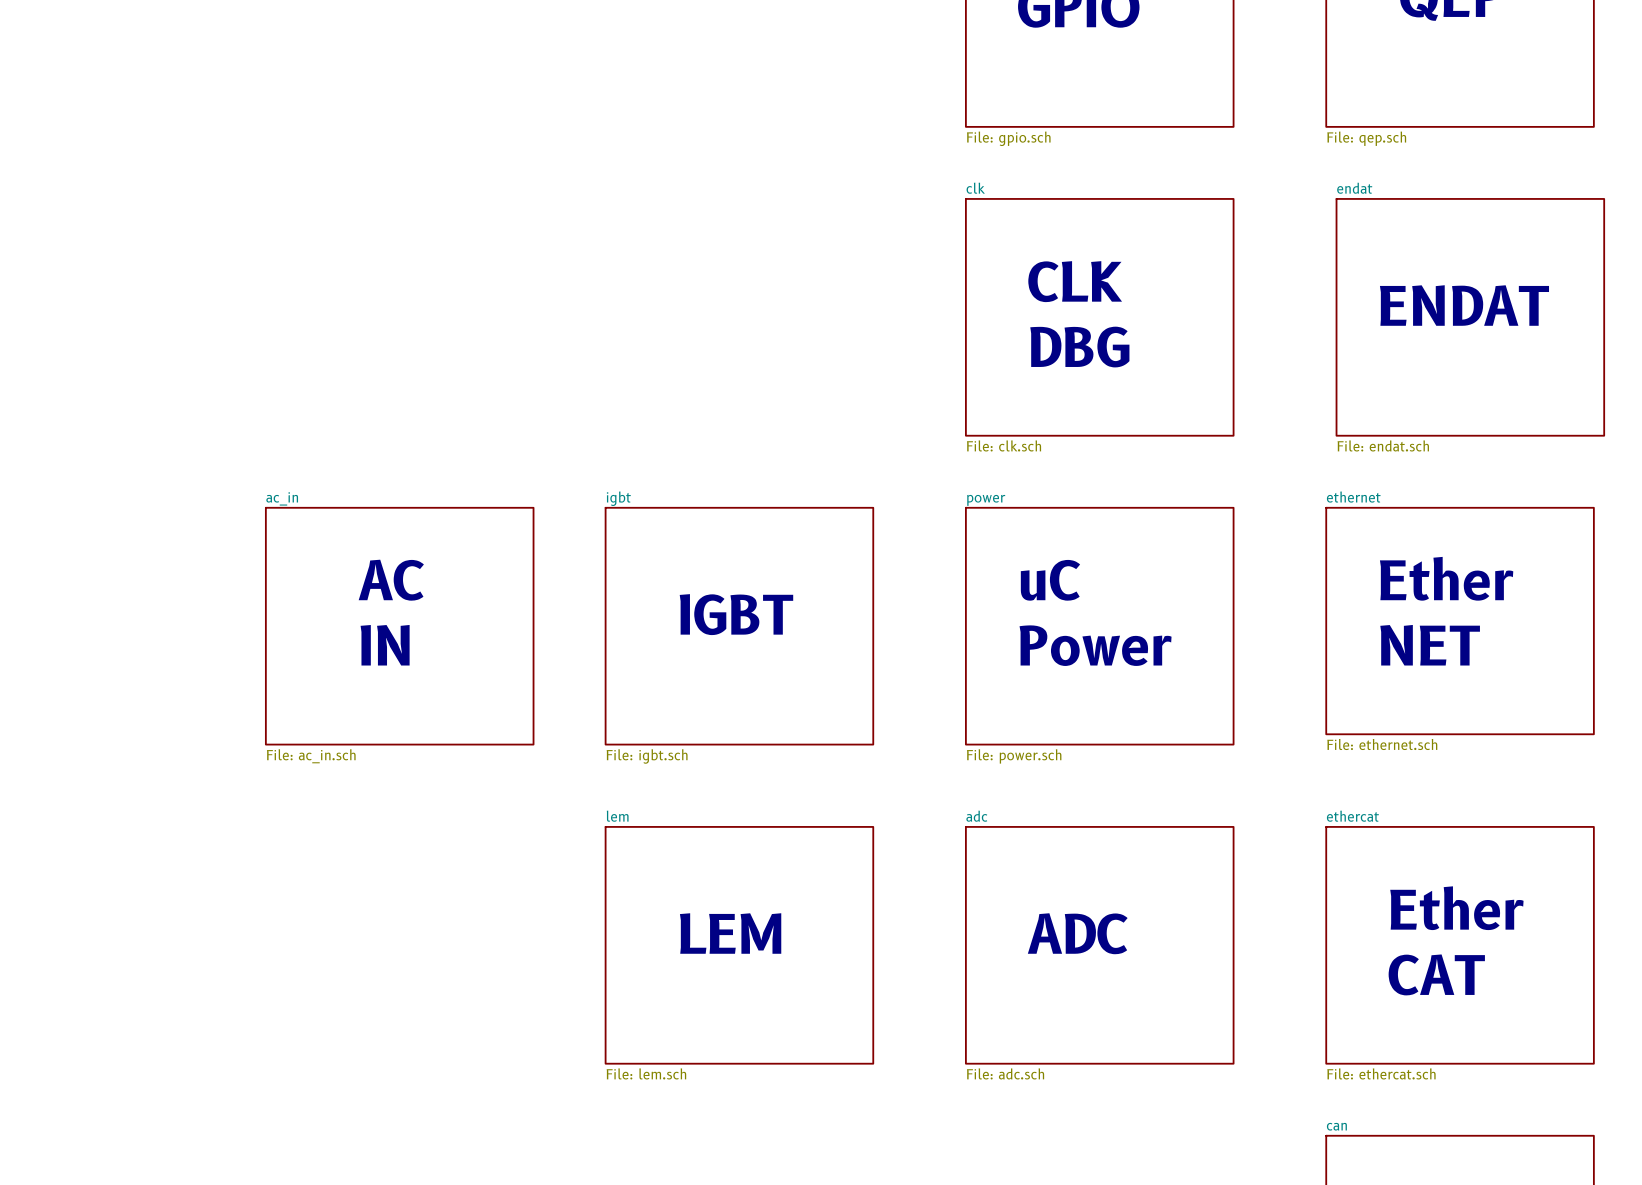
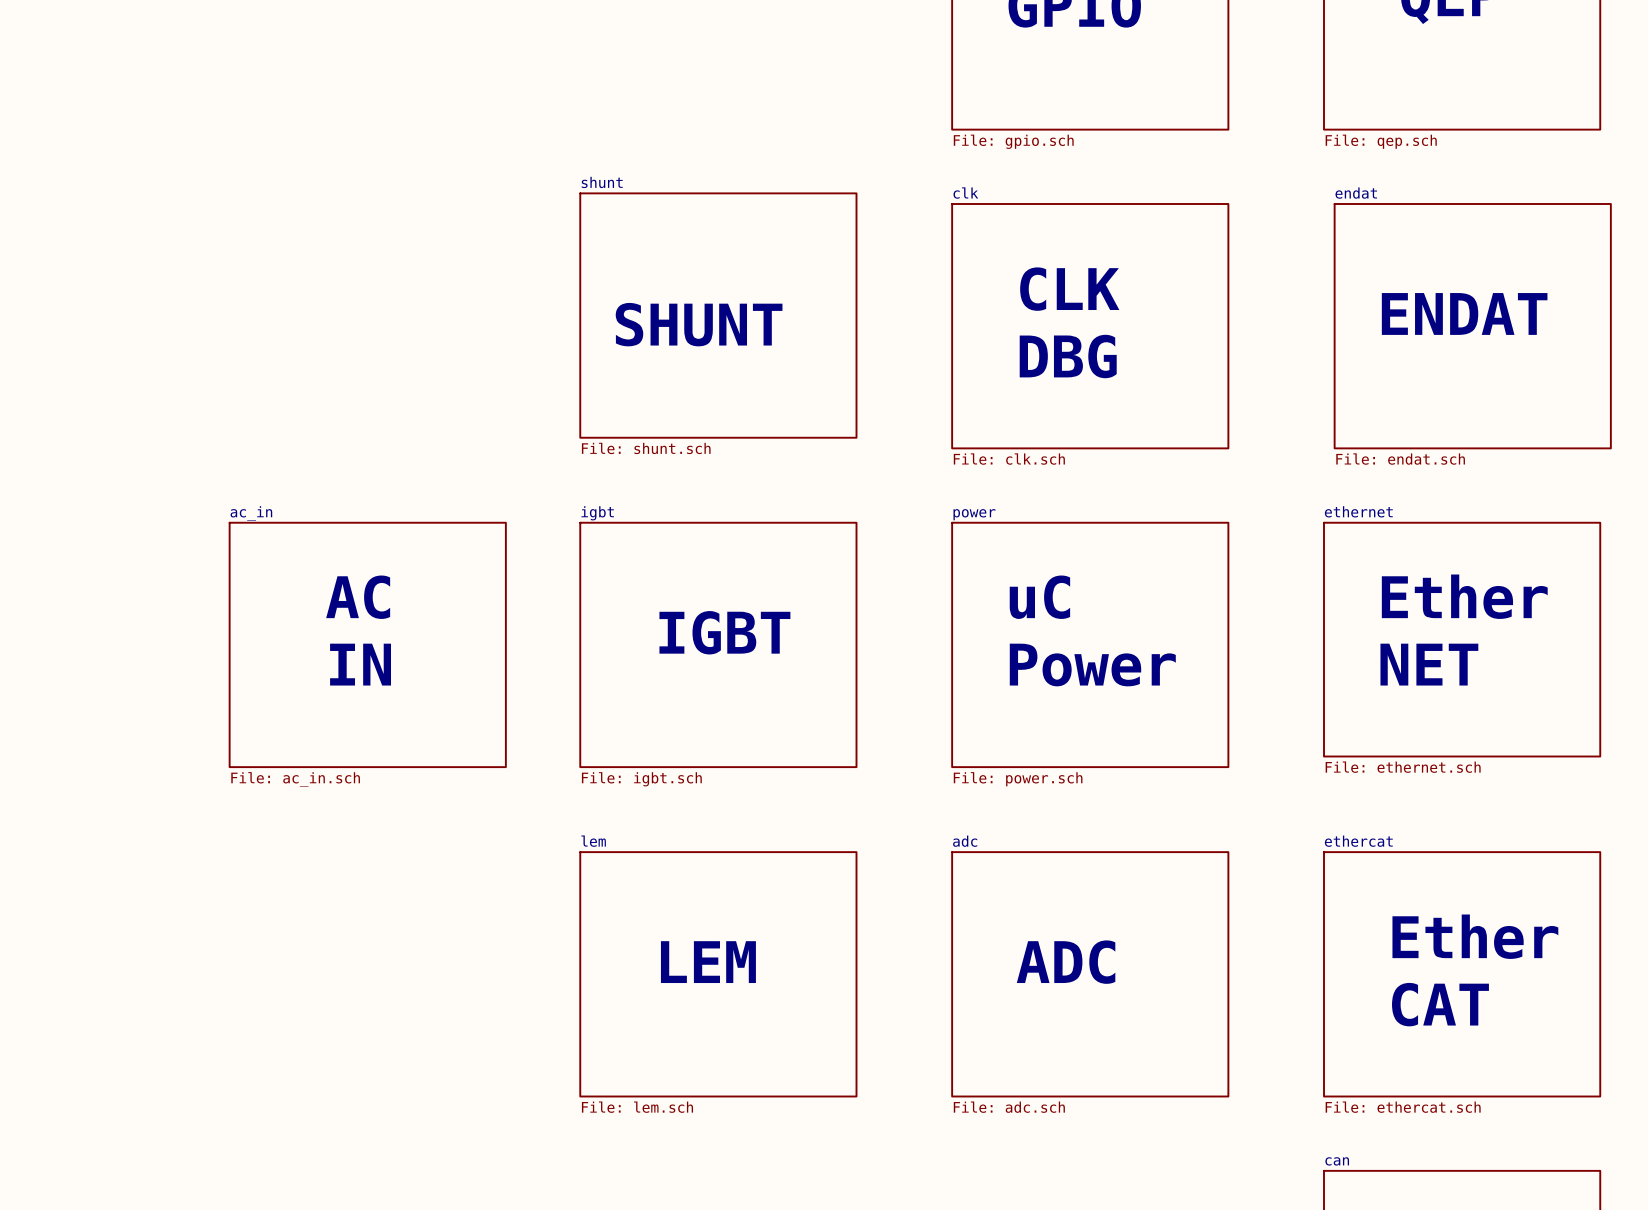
sheet shunt: none -> File: shunt.sch (718, 315)
text: none -> SHUNT (699, 324)

